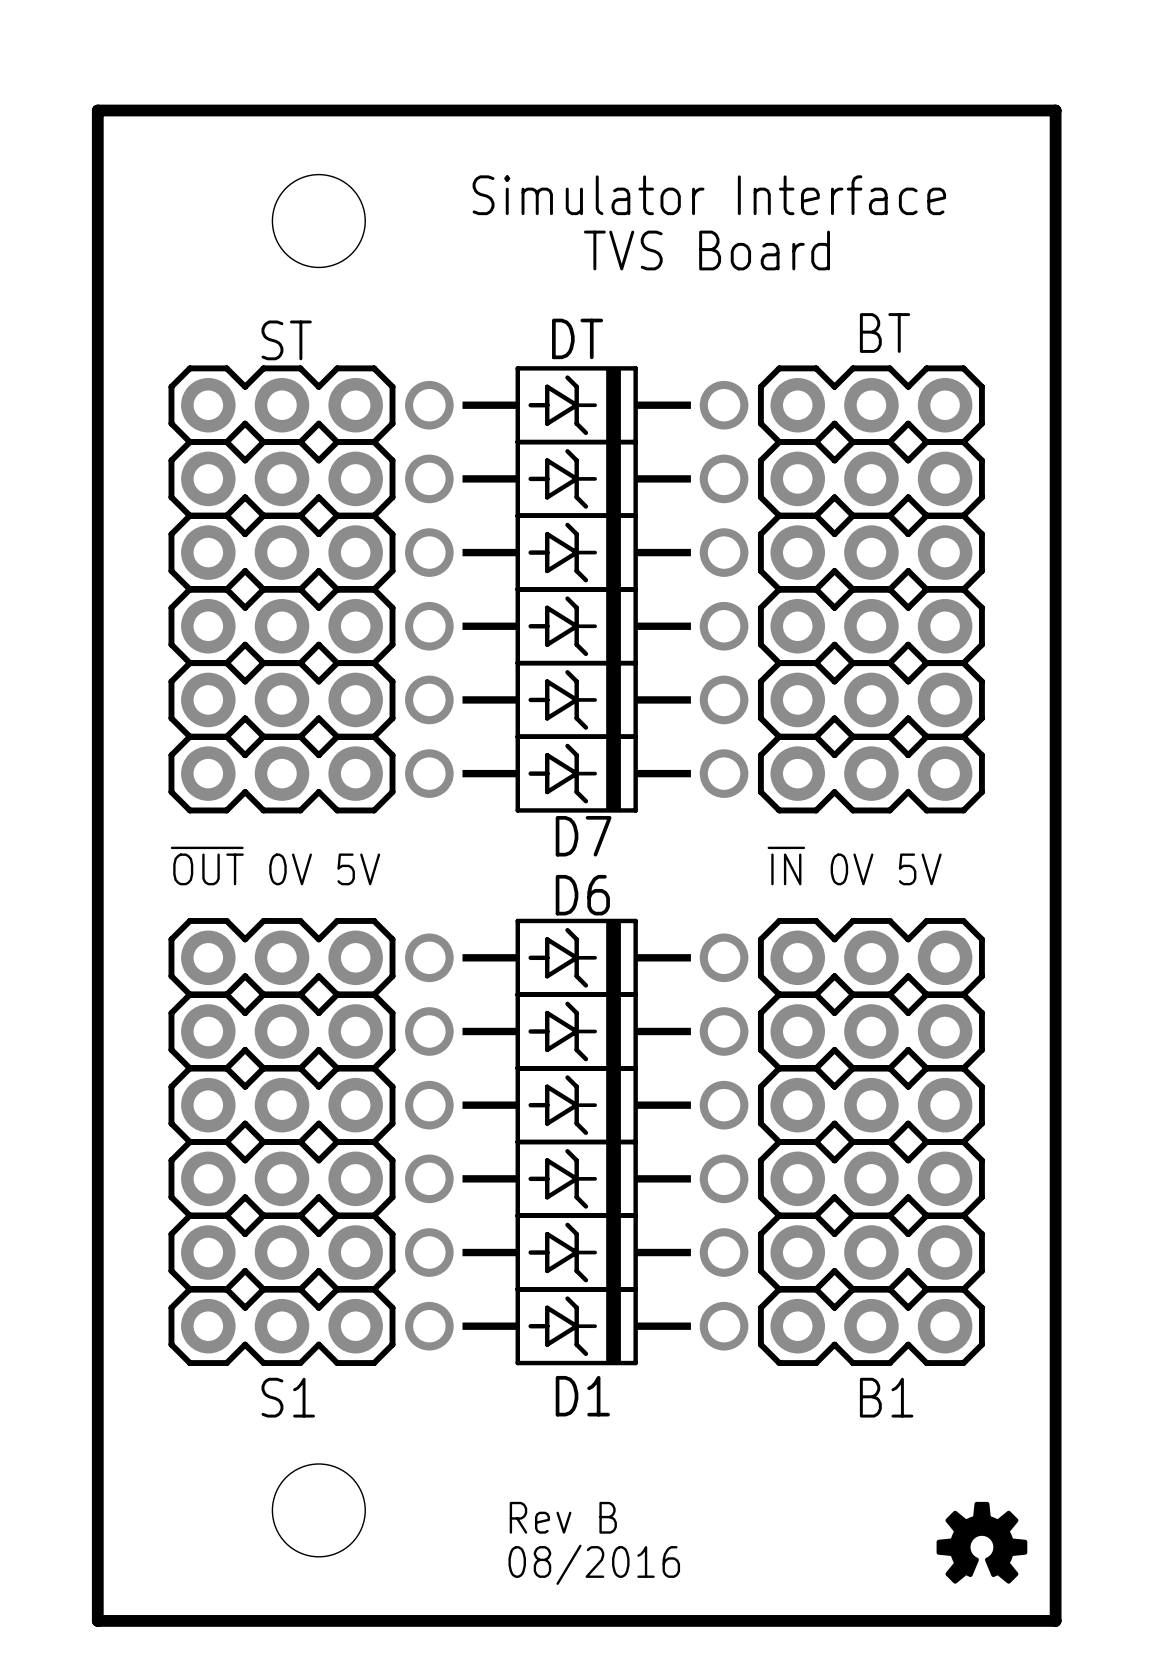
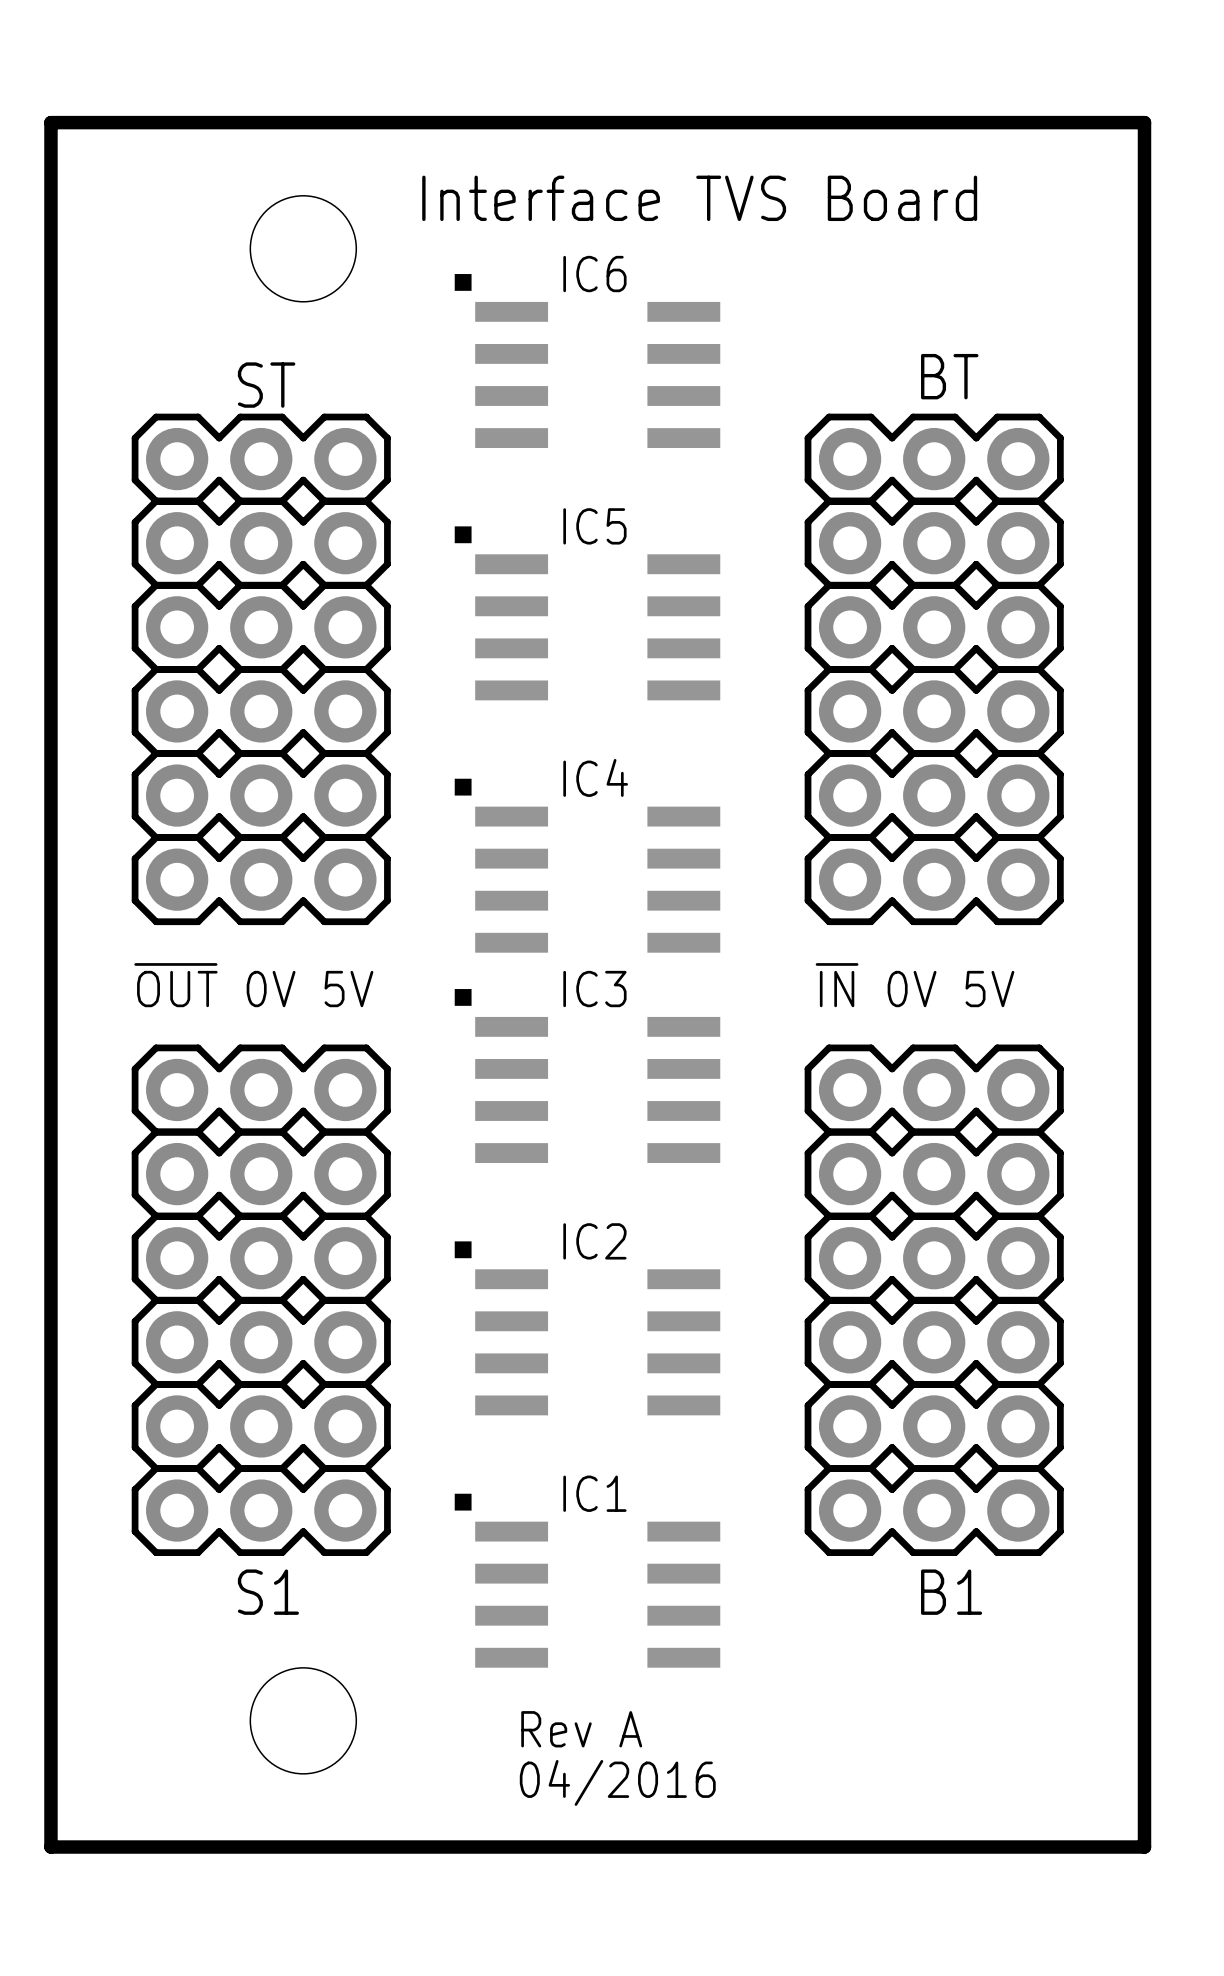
text: Simulator Interface (709, 195) -> none
drawing: none -> [454, 274, 472, 291]
text: TVS Board (706, 250) -> Interface TVS Board (699, 198)
IC6: none -> (597, 374)
DT: (576, 405) -> none
drawing: none -> [454, 526, 472, 544]
part: (576, 478) -> none
part: (576, 552) -> none
IC5: none -> (597, 627)
part: (576, 626) -> none
drawing: none -> [454, 778, 472, 796]
part: (576, 699) -> none
D7: (576, 773) -> none
IC4: none -> (597, 879)
drawing: none -> [454, 989, 472, 1006]
D6: (576, 957) -> none
IC3: none -> (597, 1089)
part: (576, 1031) -> none
drawing: none -> [454, 1241, 472, 1259]
part: (576, 1105) -> none
part: (576, 1178) -> none
IC2: none -> (597, 1342)
part: (576, 1252) -> none
drawing: none -> [454, 1493, 472, 1511]
D1: (576, 1326) -> none
IC1: none -> (597, 1594)
drawing: [936, 1501, 1028, 1584] -> none
text: Rev B (563, 1517) -> Rev A (581, 1729)
text: 08/2016 (594, 1564) -> 04/2016 (617, 1782)

